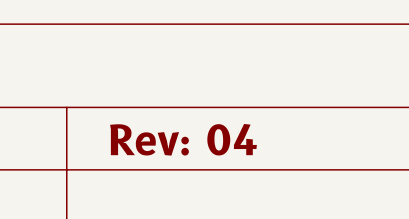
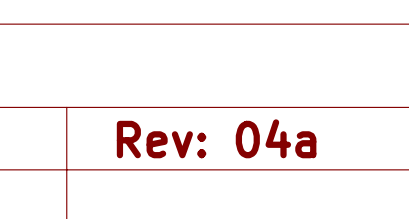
title block: Rev: 04 (183, 139) -> Rev: 04a (216, 138)

